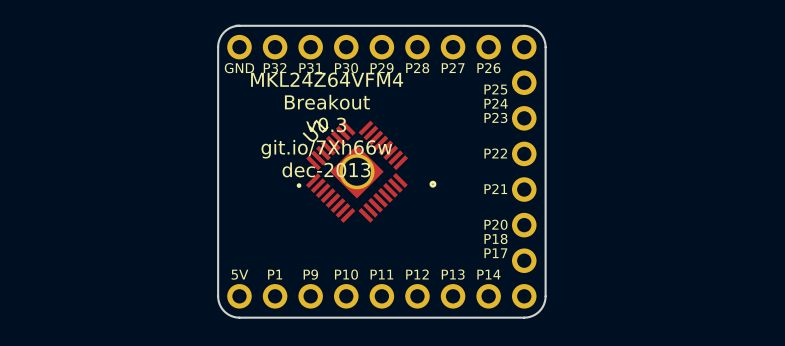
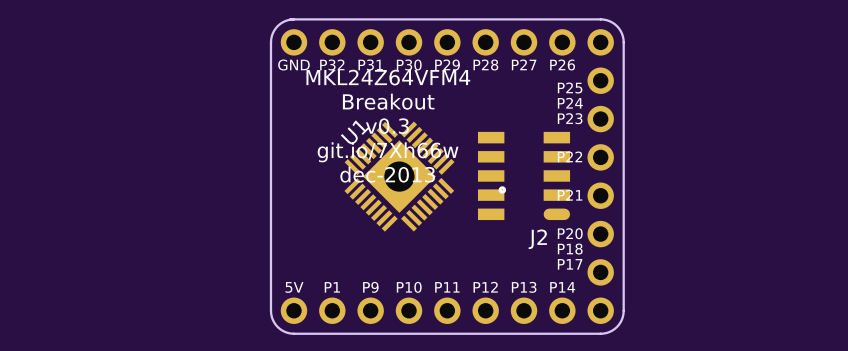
U1 footprint: [296, 120, 409, 223] -> [344, 121, 455, 232]
J2: none -> (524, 175)

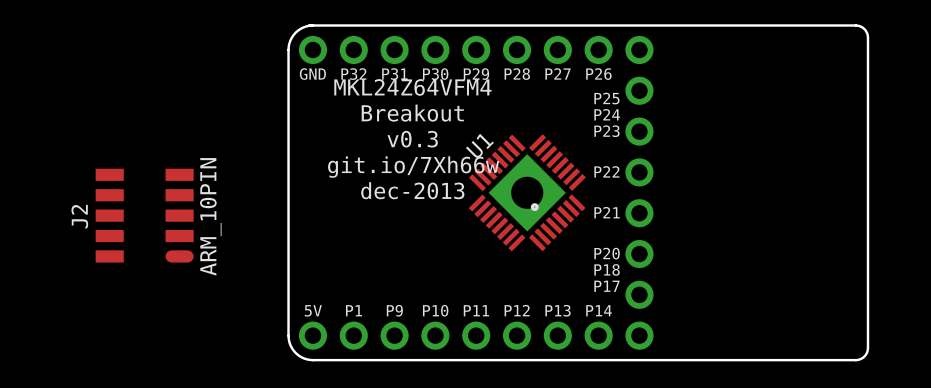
board edge: (600, 19) (609, 21) (616, 26) (621, 33) (623, 42) (623, 313) (620, 322) (614, 329) (600, 333) -> (639, 25) (855, 25) (864, 29) (867, 37) (867, 347) (865, 355) (855, 360) (639, 360)
J2 position: (524, 175) -> (144, 215)
U1 position: (399, 176) -> (527, 192)
J2 value: none -> ARM_10PIN (210, 216)
J2 name rotation: 0° (537, 239) -> 90° counterclockwise (79, 216)
J2 name position: J2 (537, 239) -> J2 (79, 216)

